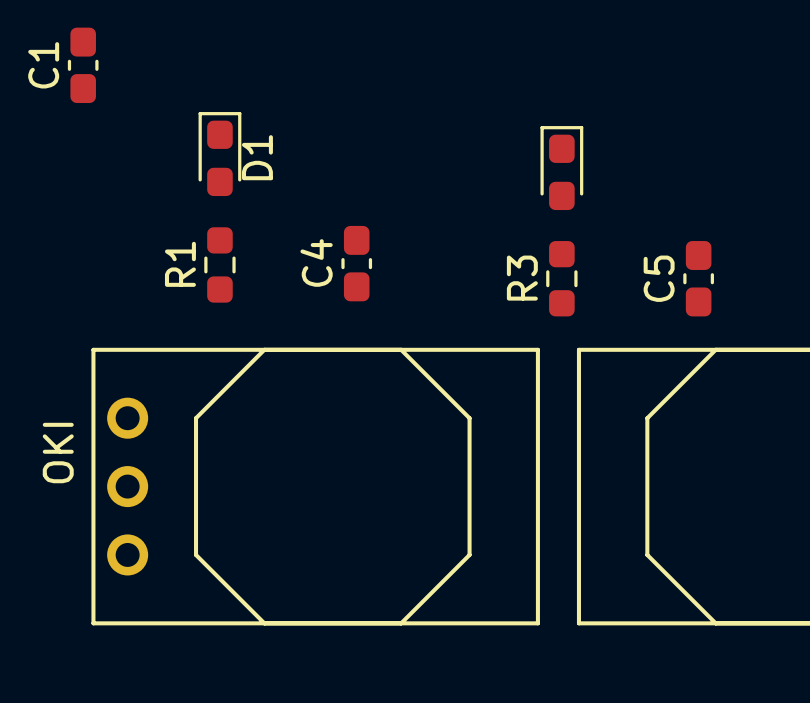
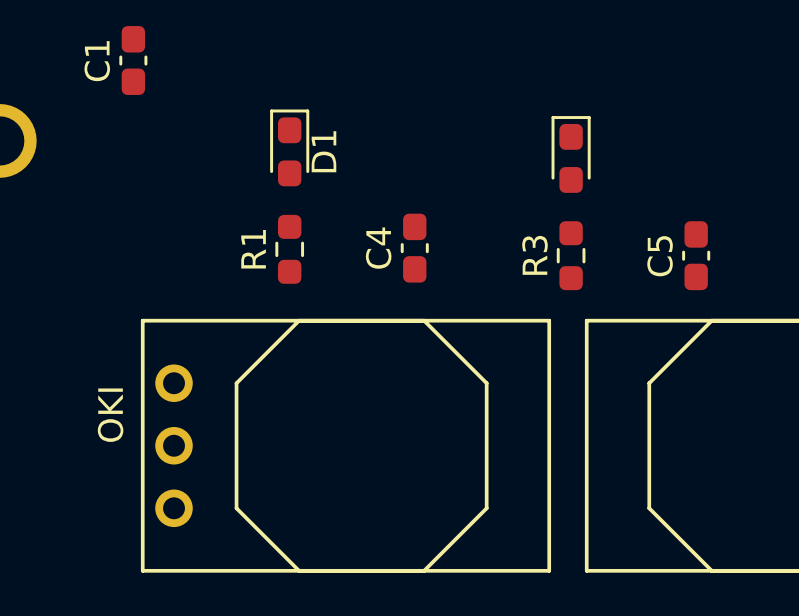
D1 position: (219, 154) -> (289, 147)
C4 position: (356, 263) -> (414, 248)
R1 position: (219, 264) -> (289, 249)

